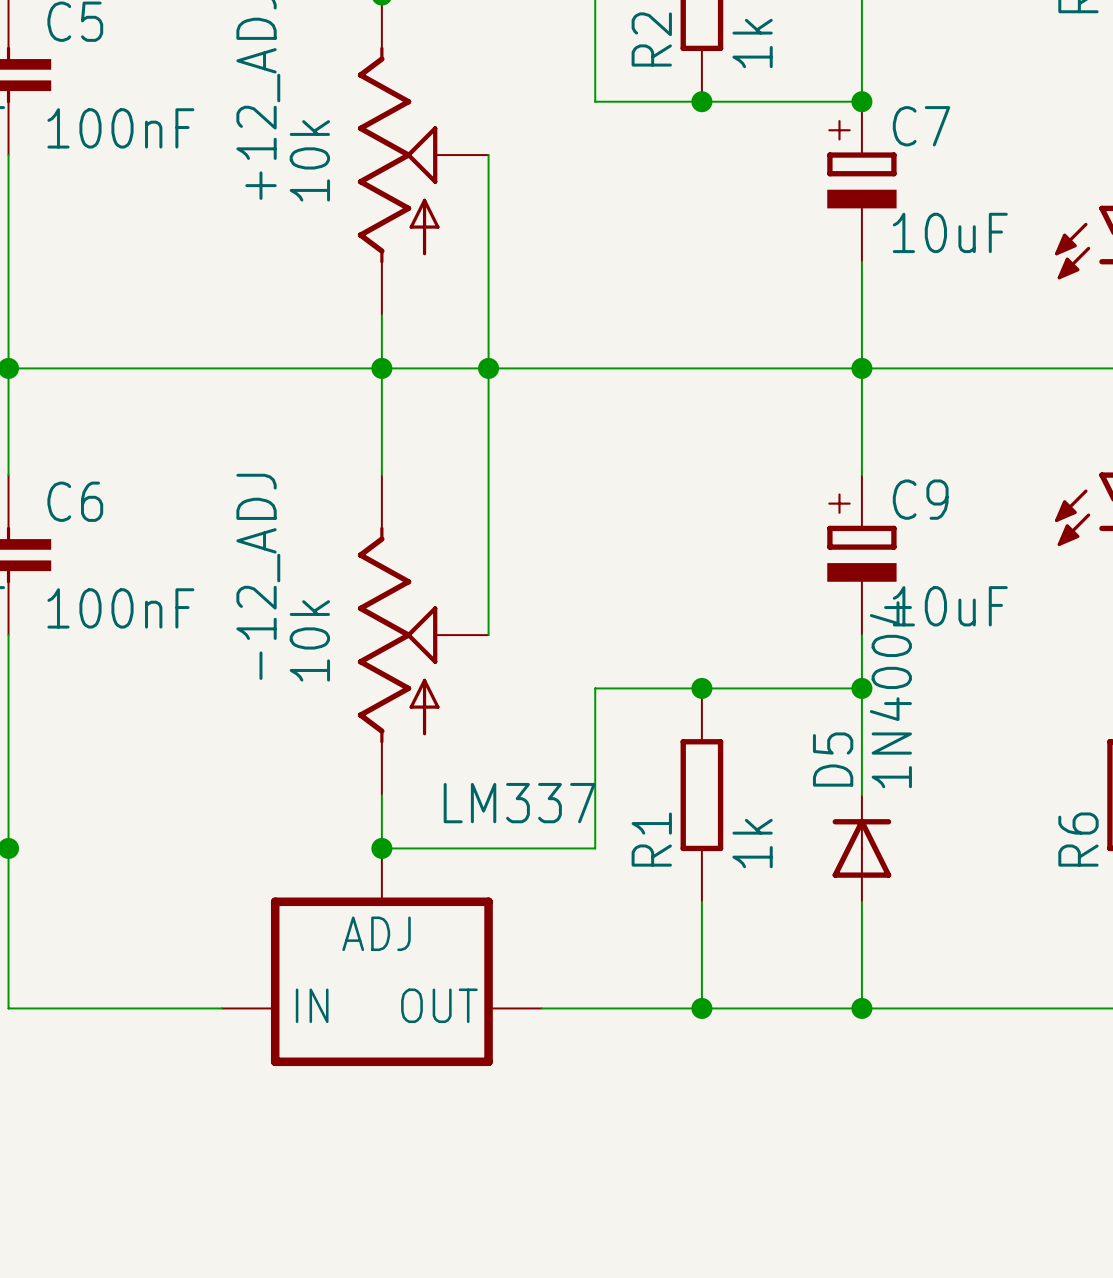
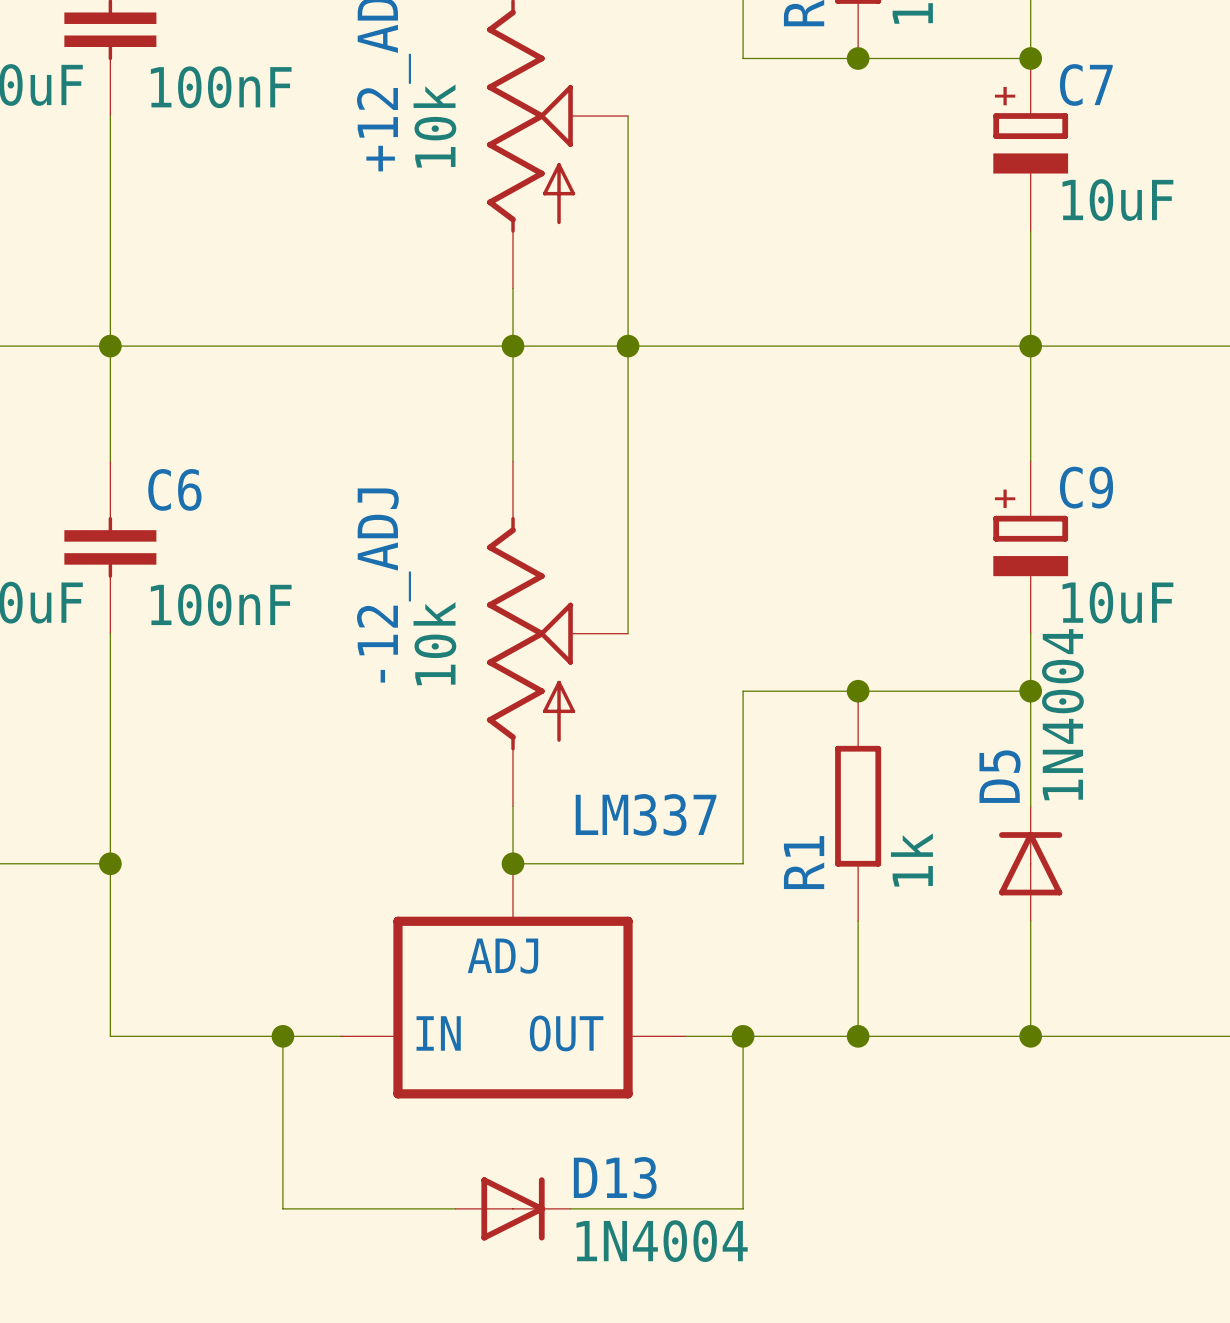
wire: none -> (282, 1036) (282, 1208) (455, 1208)
junction: none -> (282, 1036)
wire: none -> (743, 1036) (743, 1208) (570, 1208)
junction: none -> (743, 1036)
D13: none -> 1N4004 (513, 1208)

